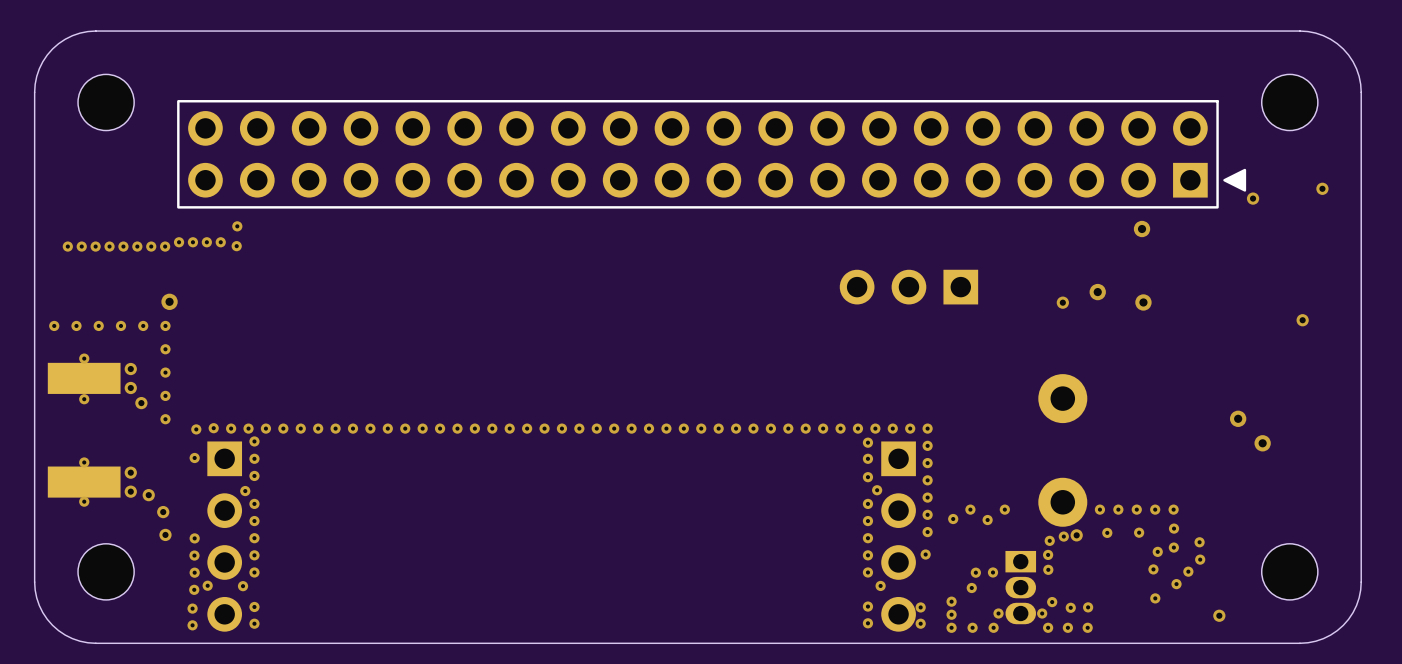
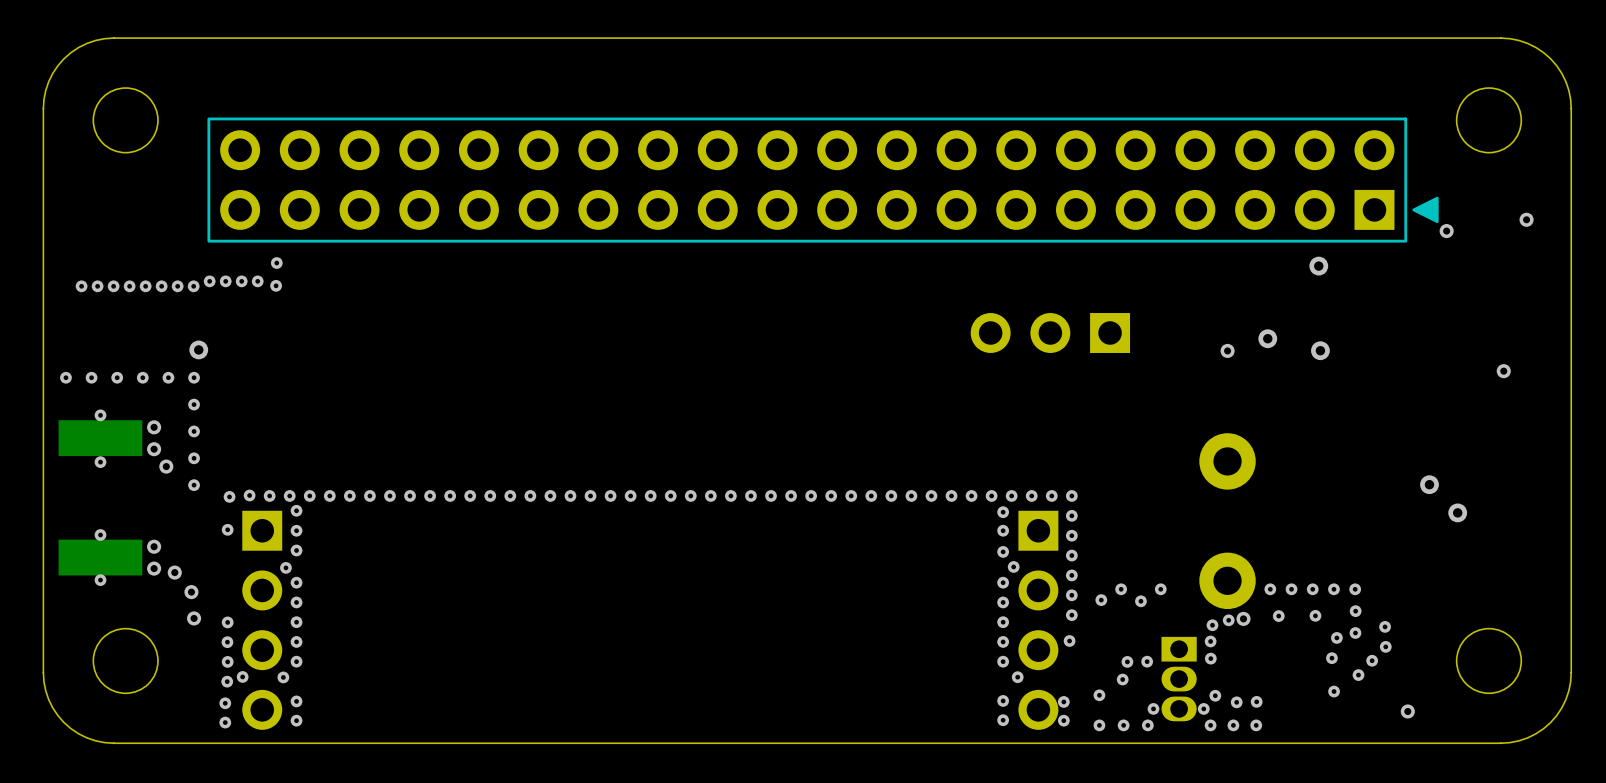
via: (951, 614) -> none

